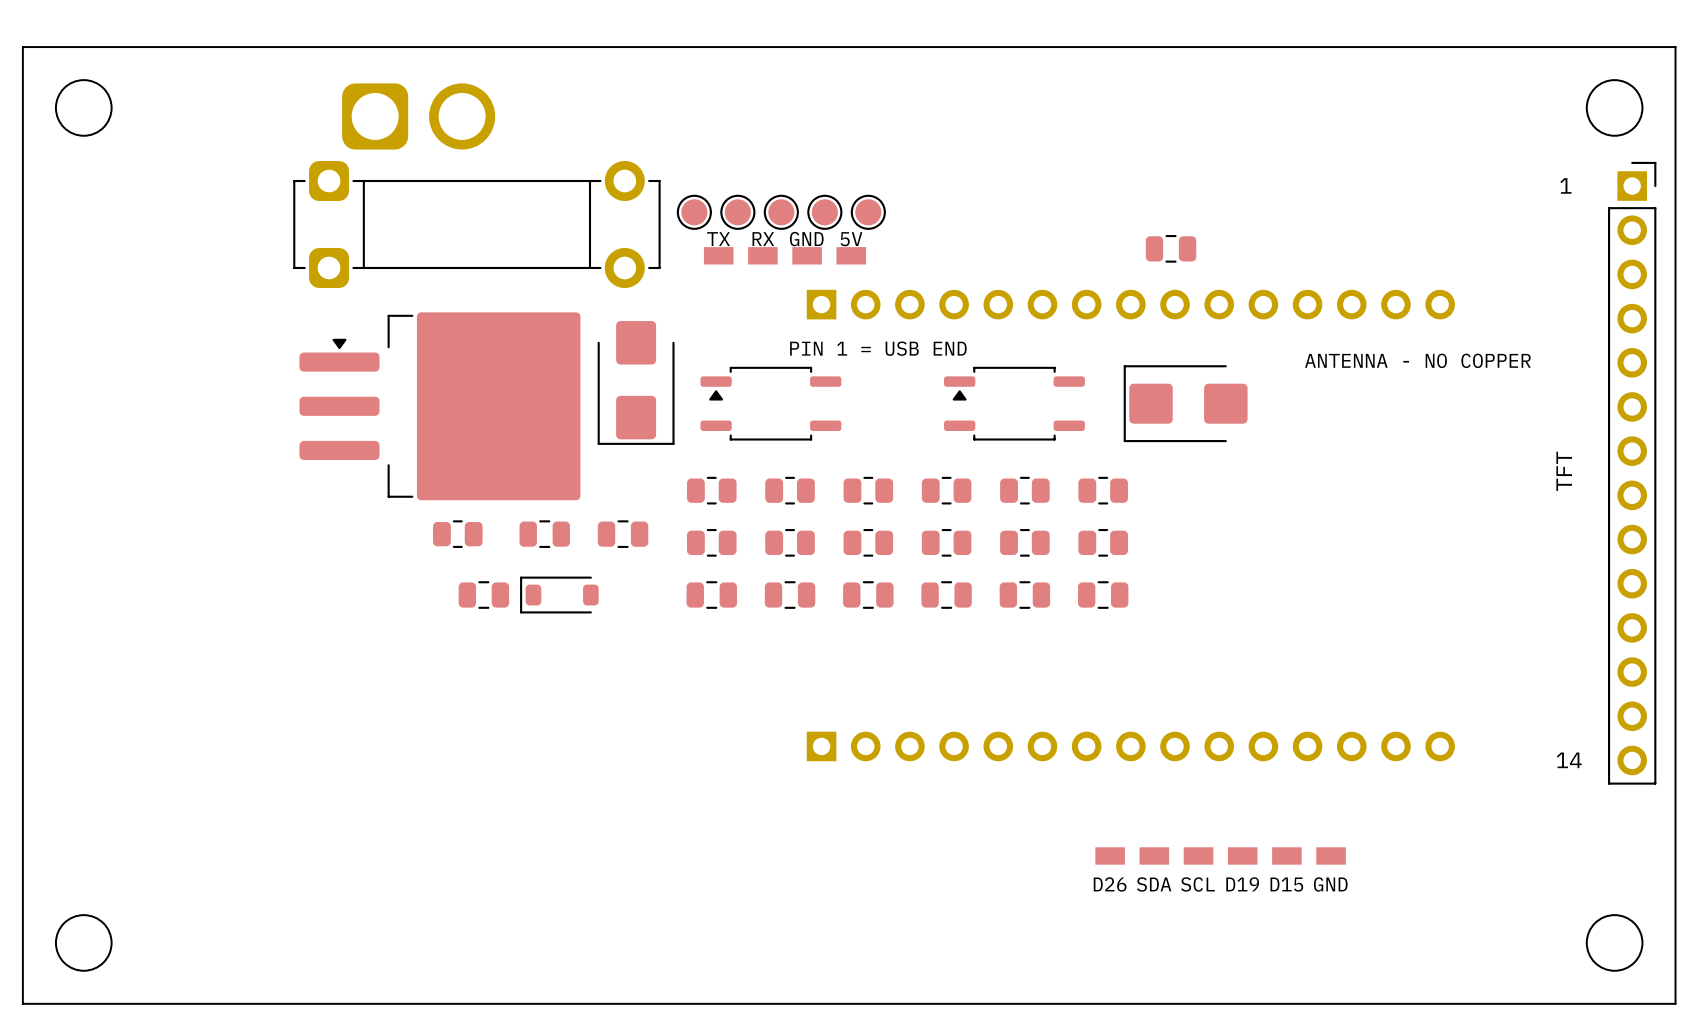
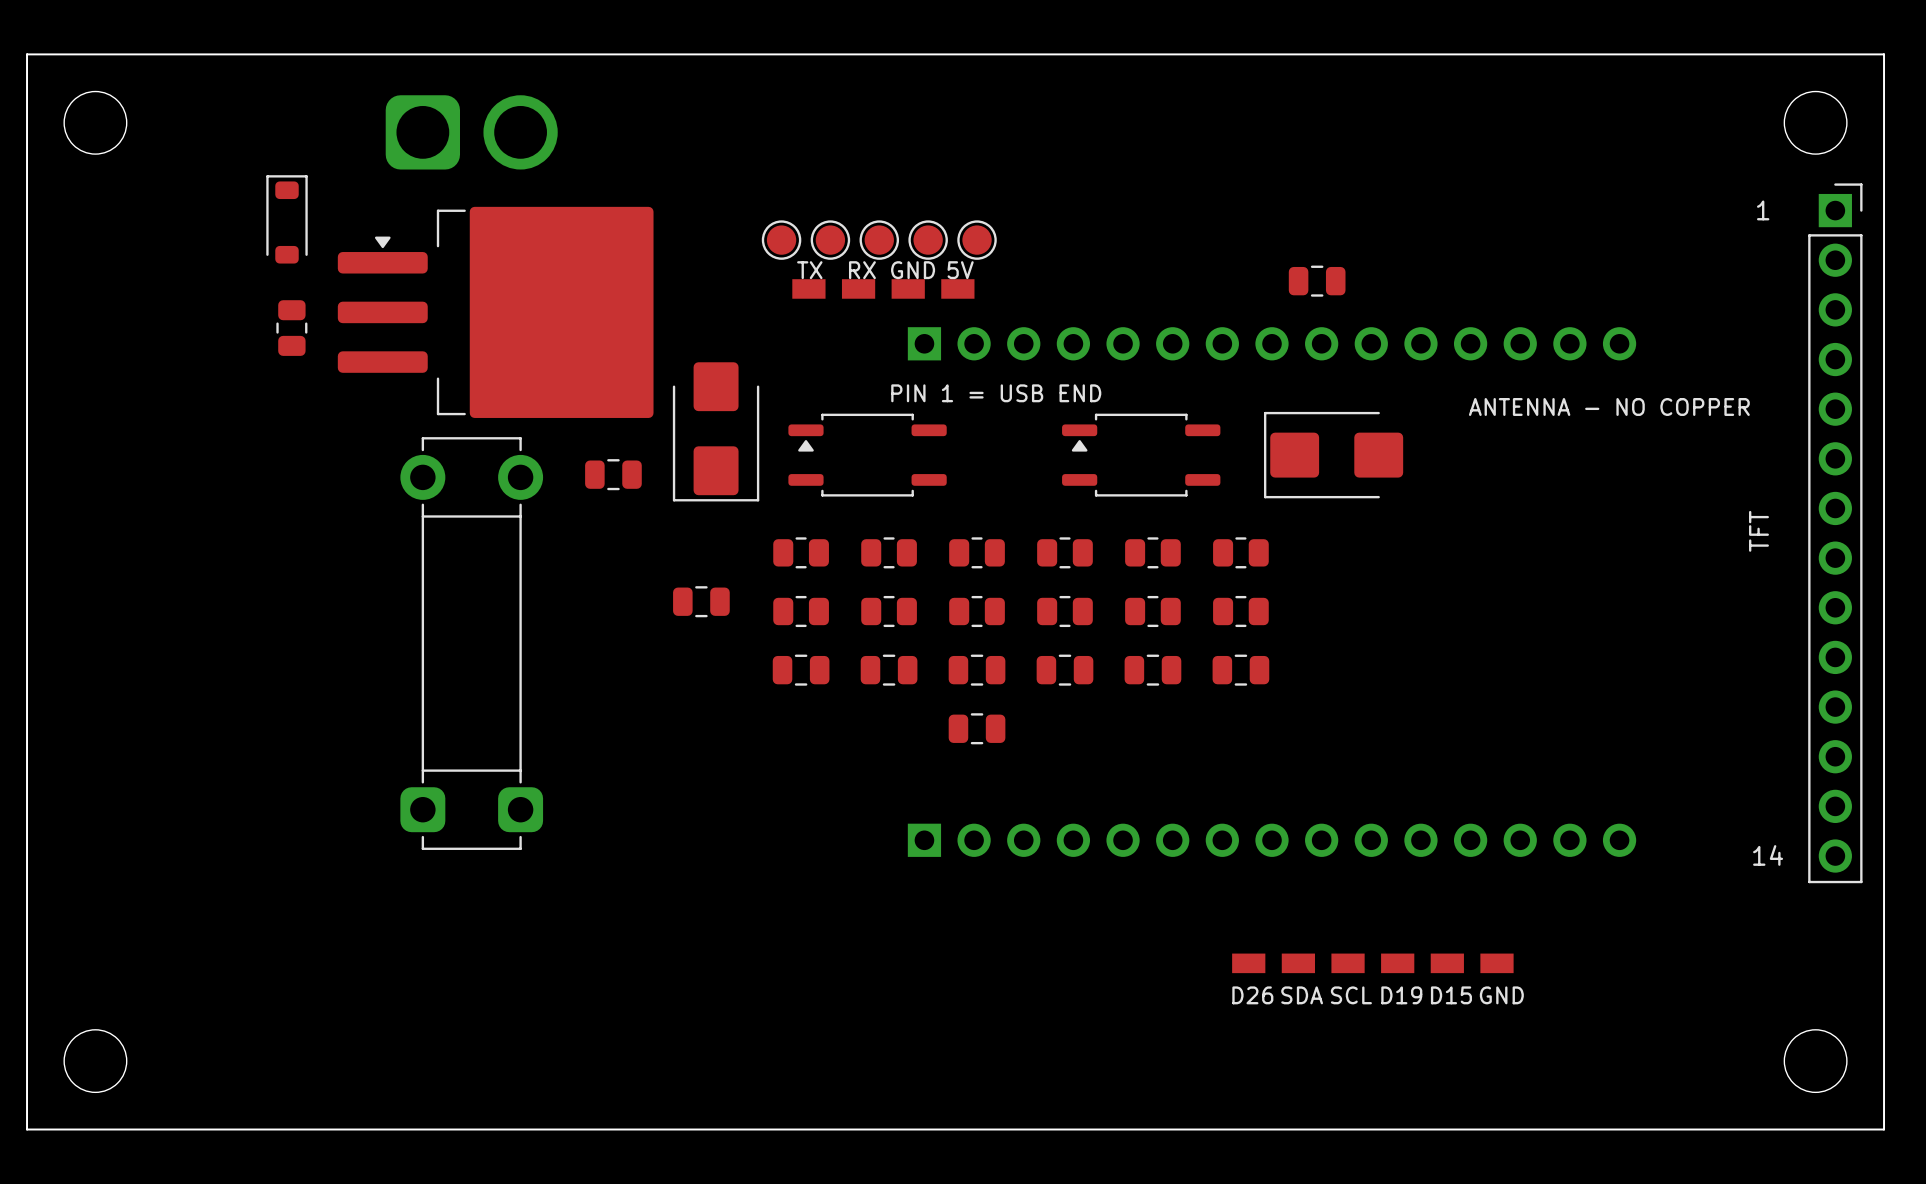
part: none -> (287, 219)
part rotation: 0° (476, 224) -> 90° counterclockwise (471, 643)
part position: (476, 224) -> (471, 643)
part position: (439, 406) -> (495, 312)
part: none -> (613, 474)
part rotation: 0° (457, 534) -> 90° clockwise (291, 328)
part position: (457, 534) -> (291, 328)
part: (544, 534) -> none
part: (483, 595) -> none
part: (559, 595) -> none
part: none -> (977, 728)

